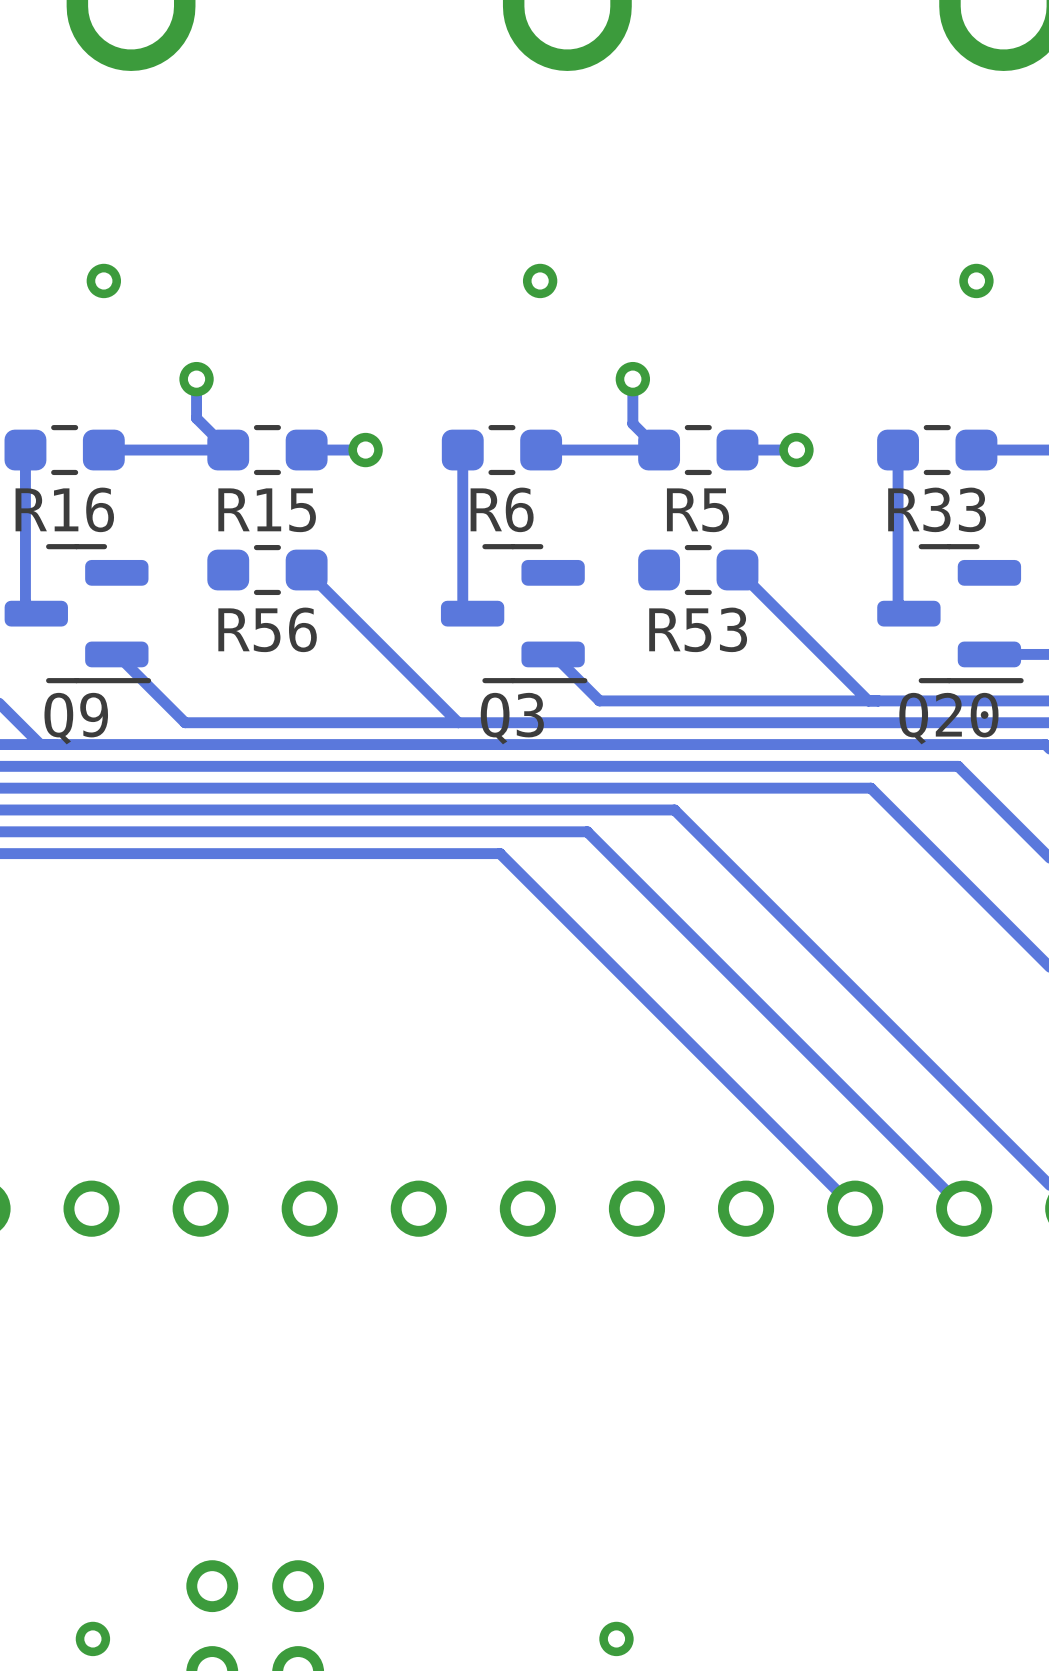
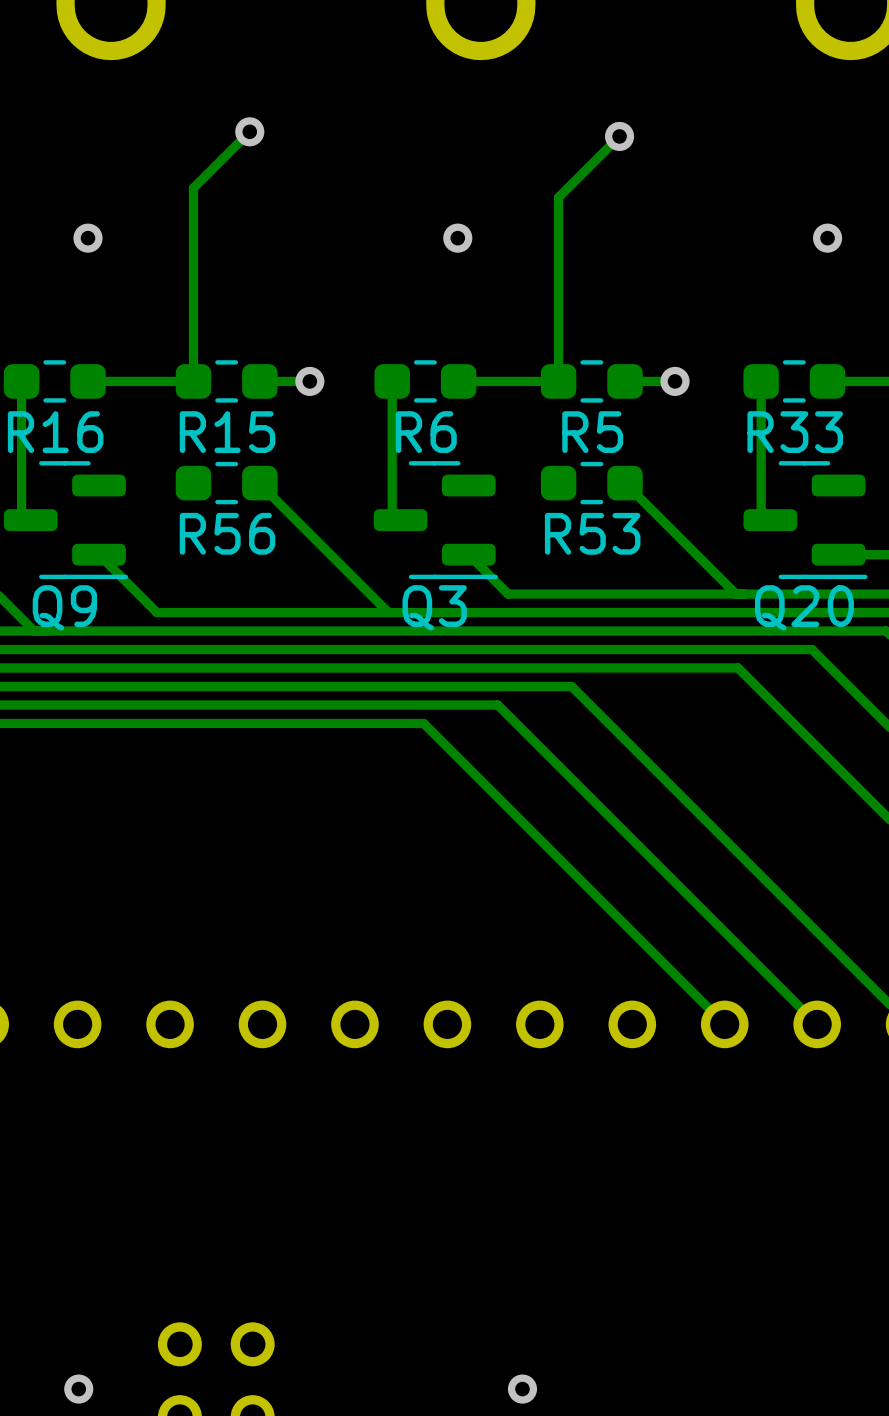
via: none -> (249, 131)
via: none -> (619, 136)
track: (196, 379) (196, 418) (228, 450) -> (249, 131) (193, 188) (193, 381)
via: (196, 379) -> none
track: (632, 379) (632, 423) (659, 450) -> (619, 136) (558, 197) (558, 381)
via: (632, 379) -> none

